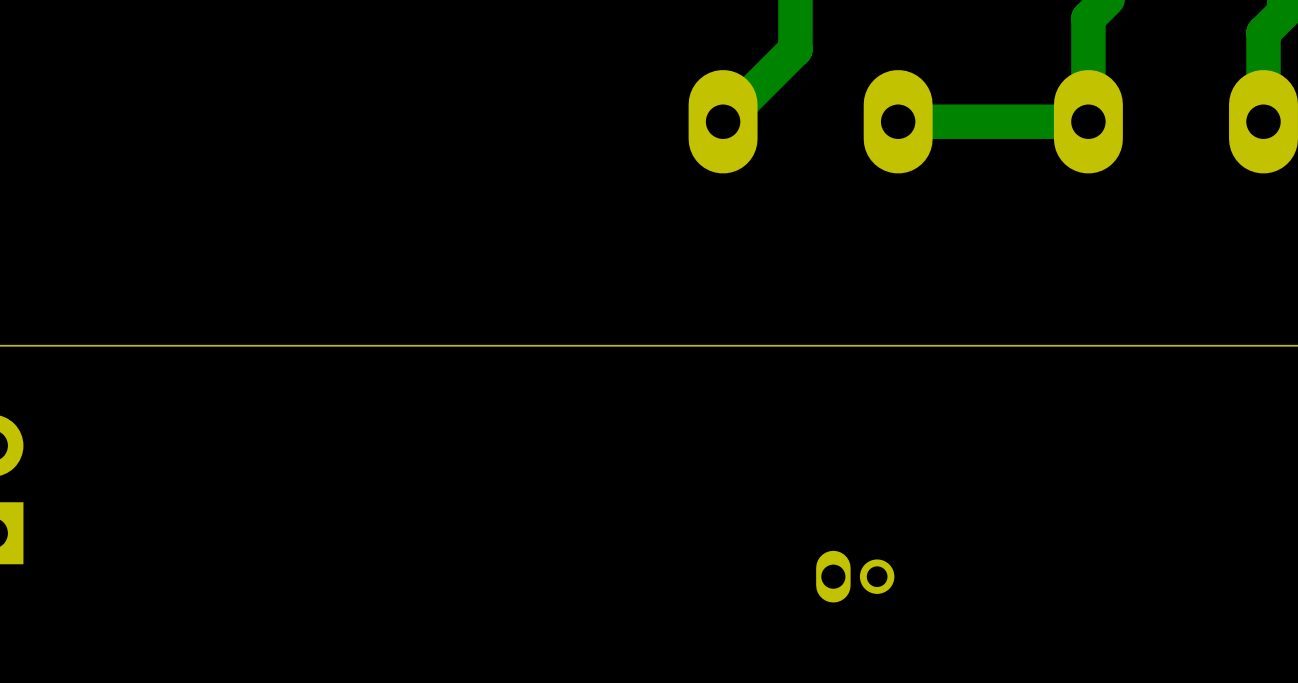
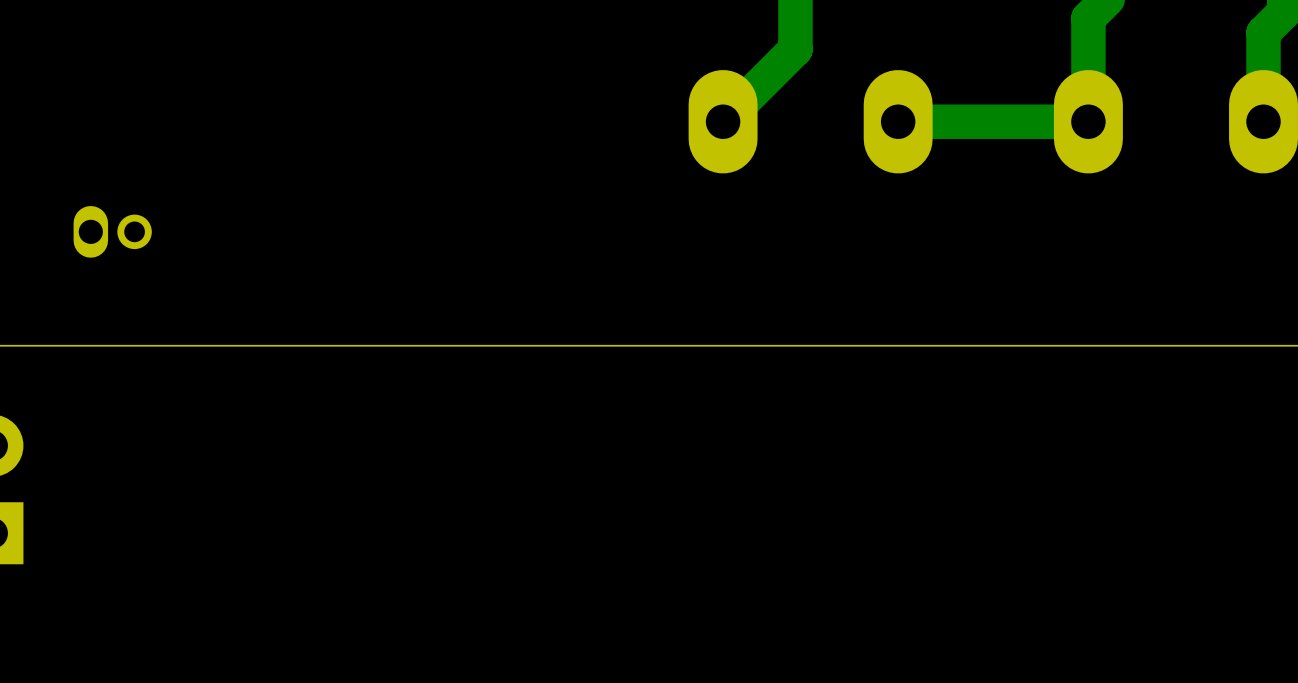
part position: (855, 576) -> (112, 231)

